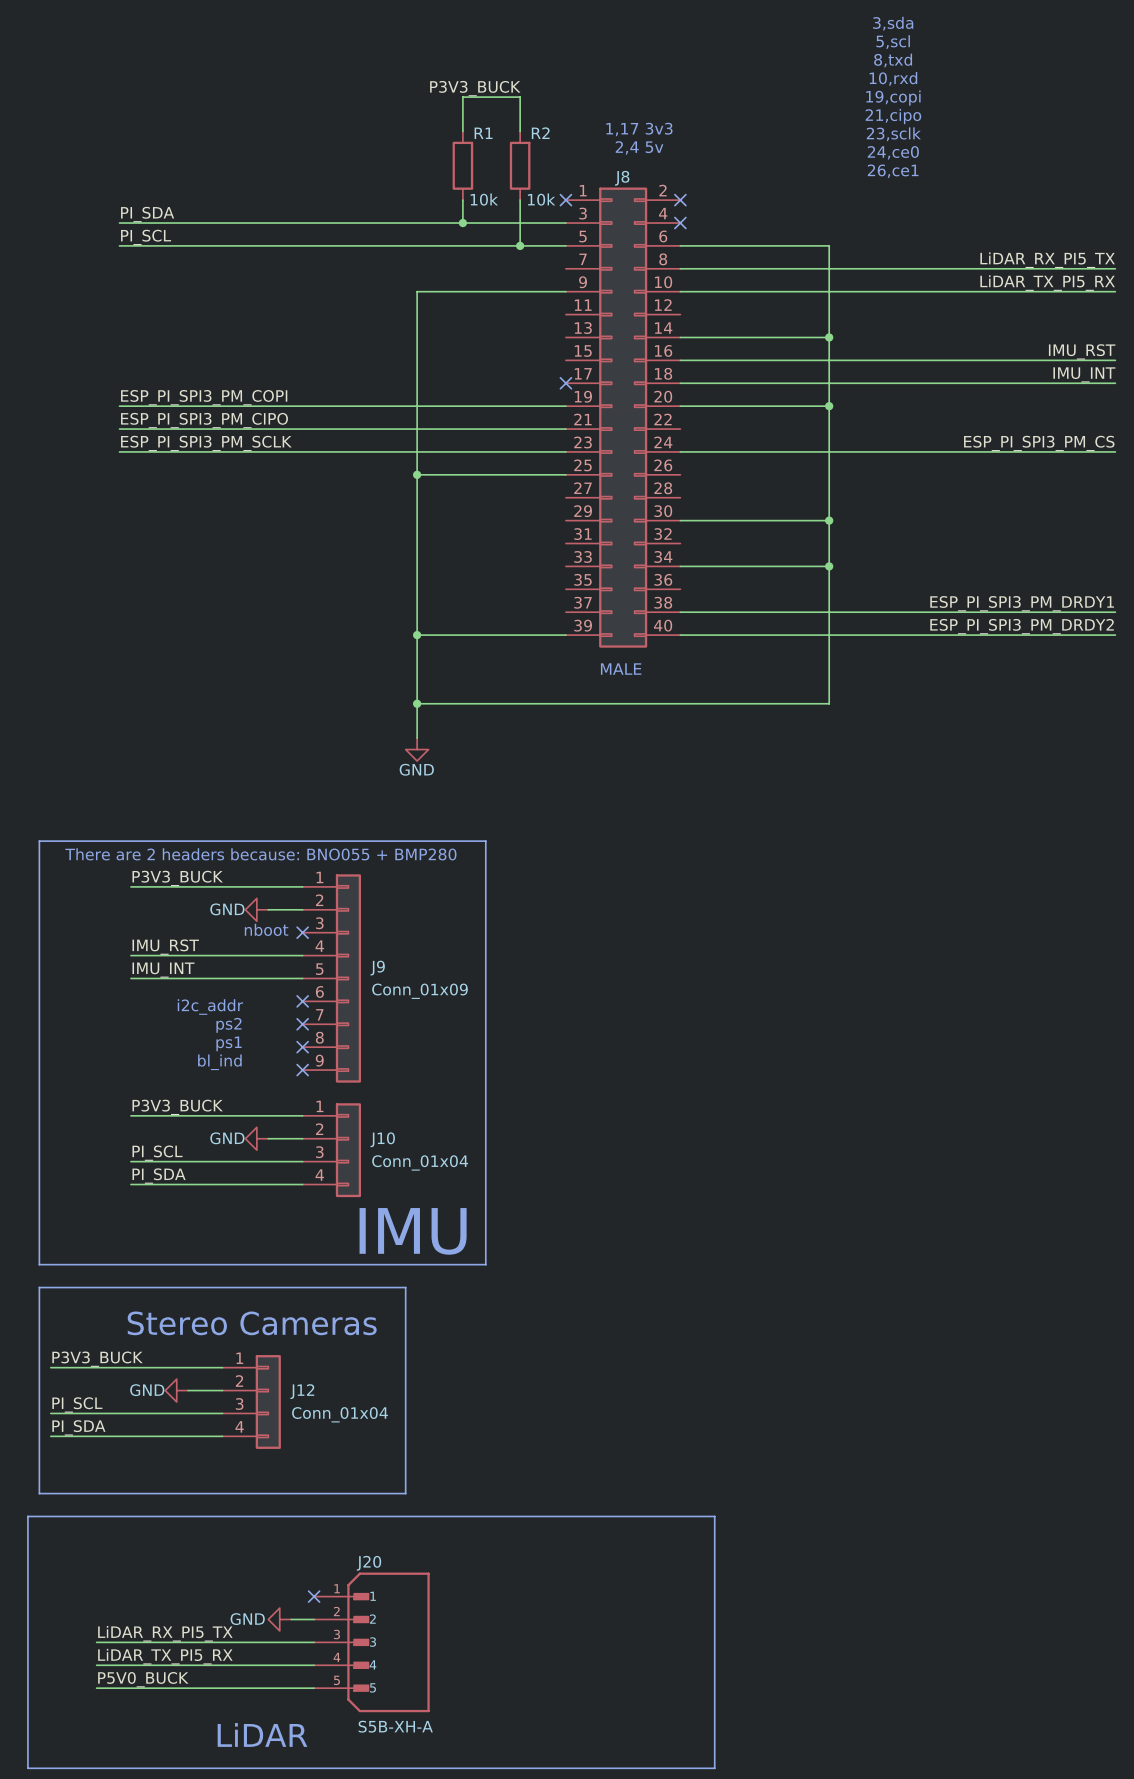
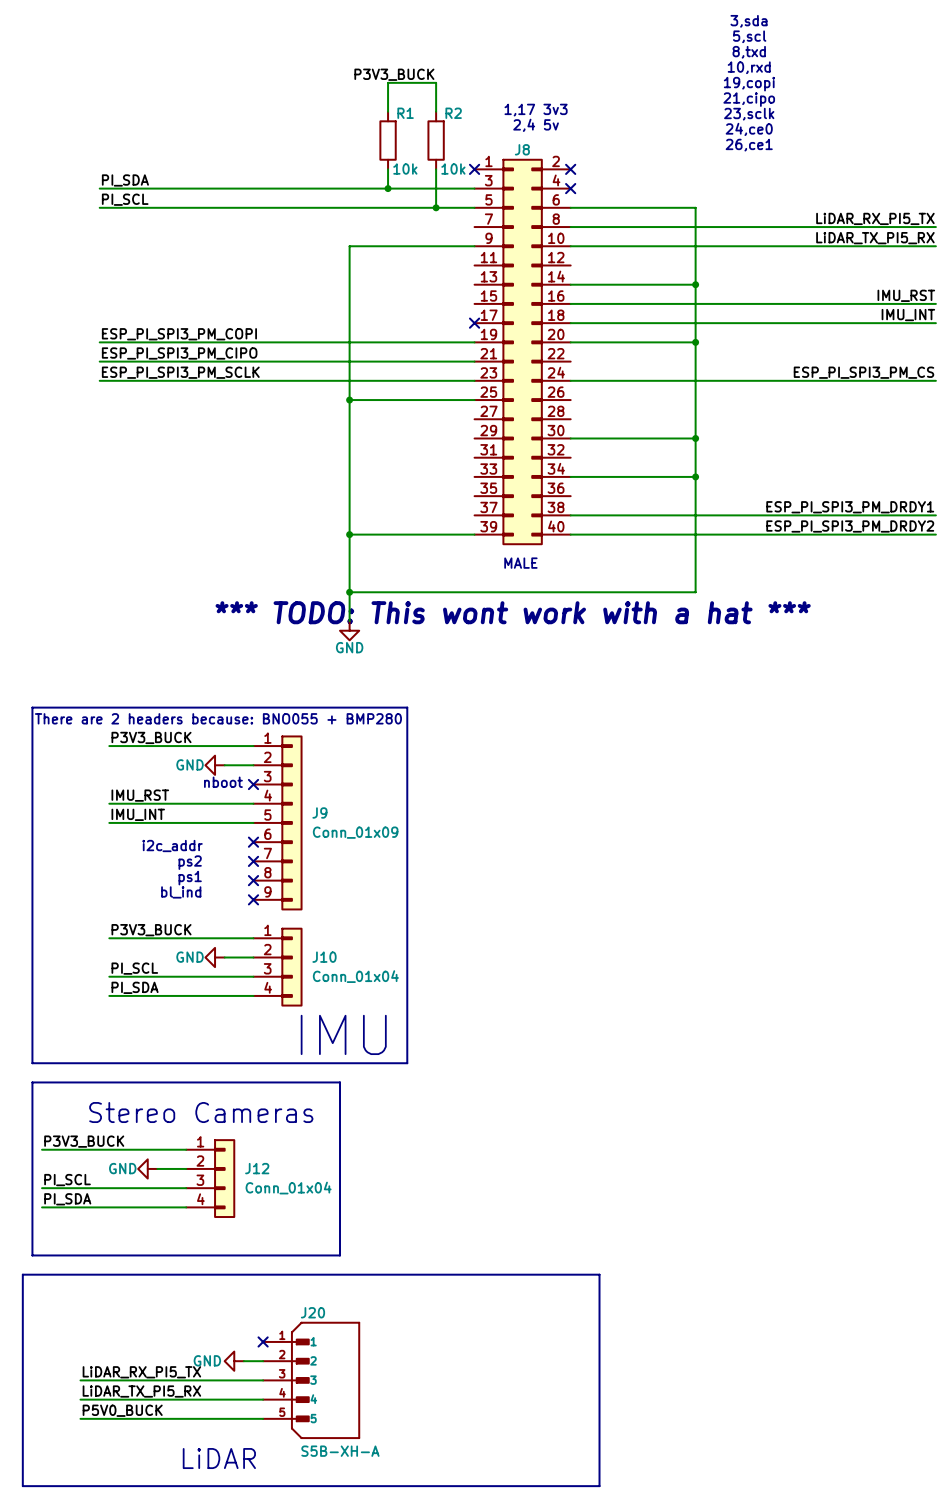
text: none -> *** TODO: This wont work with a hat *** (513, 612)

